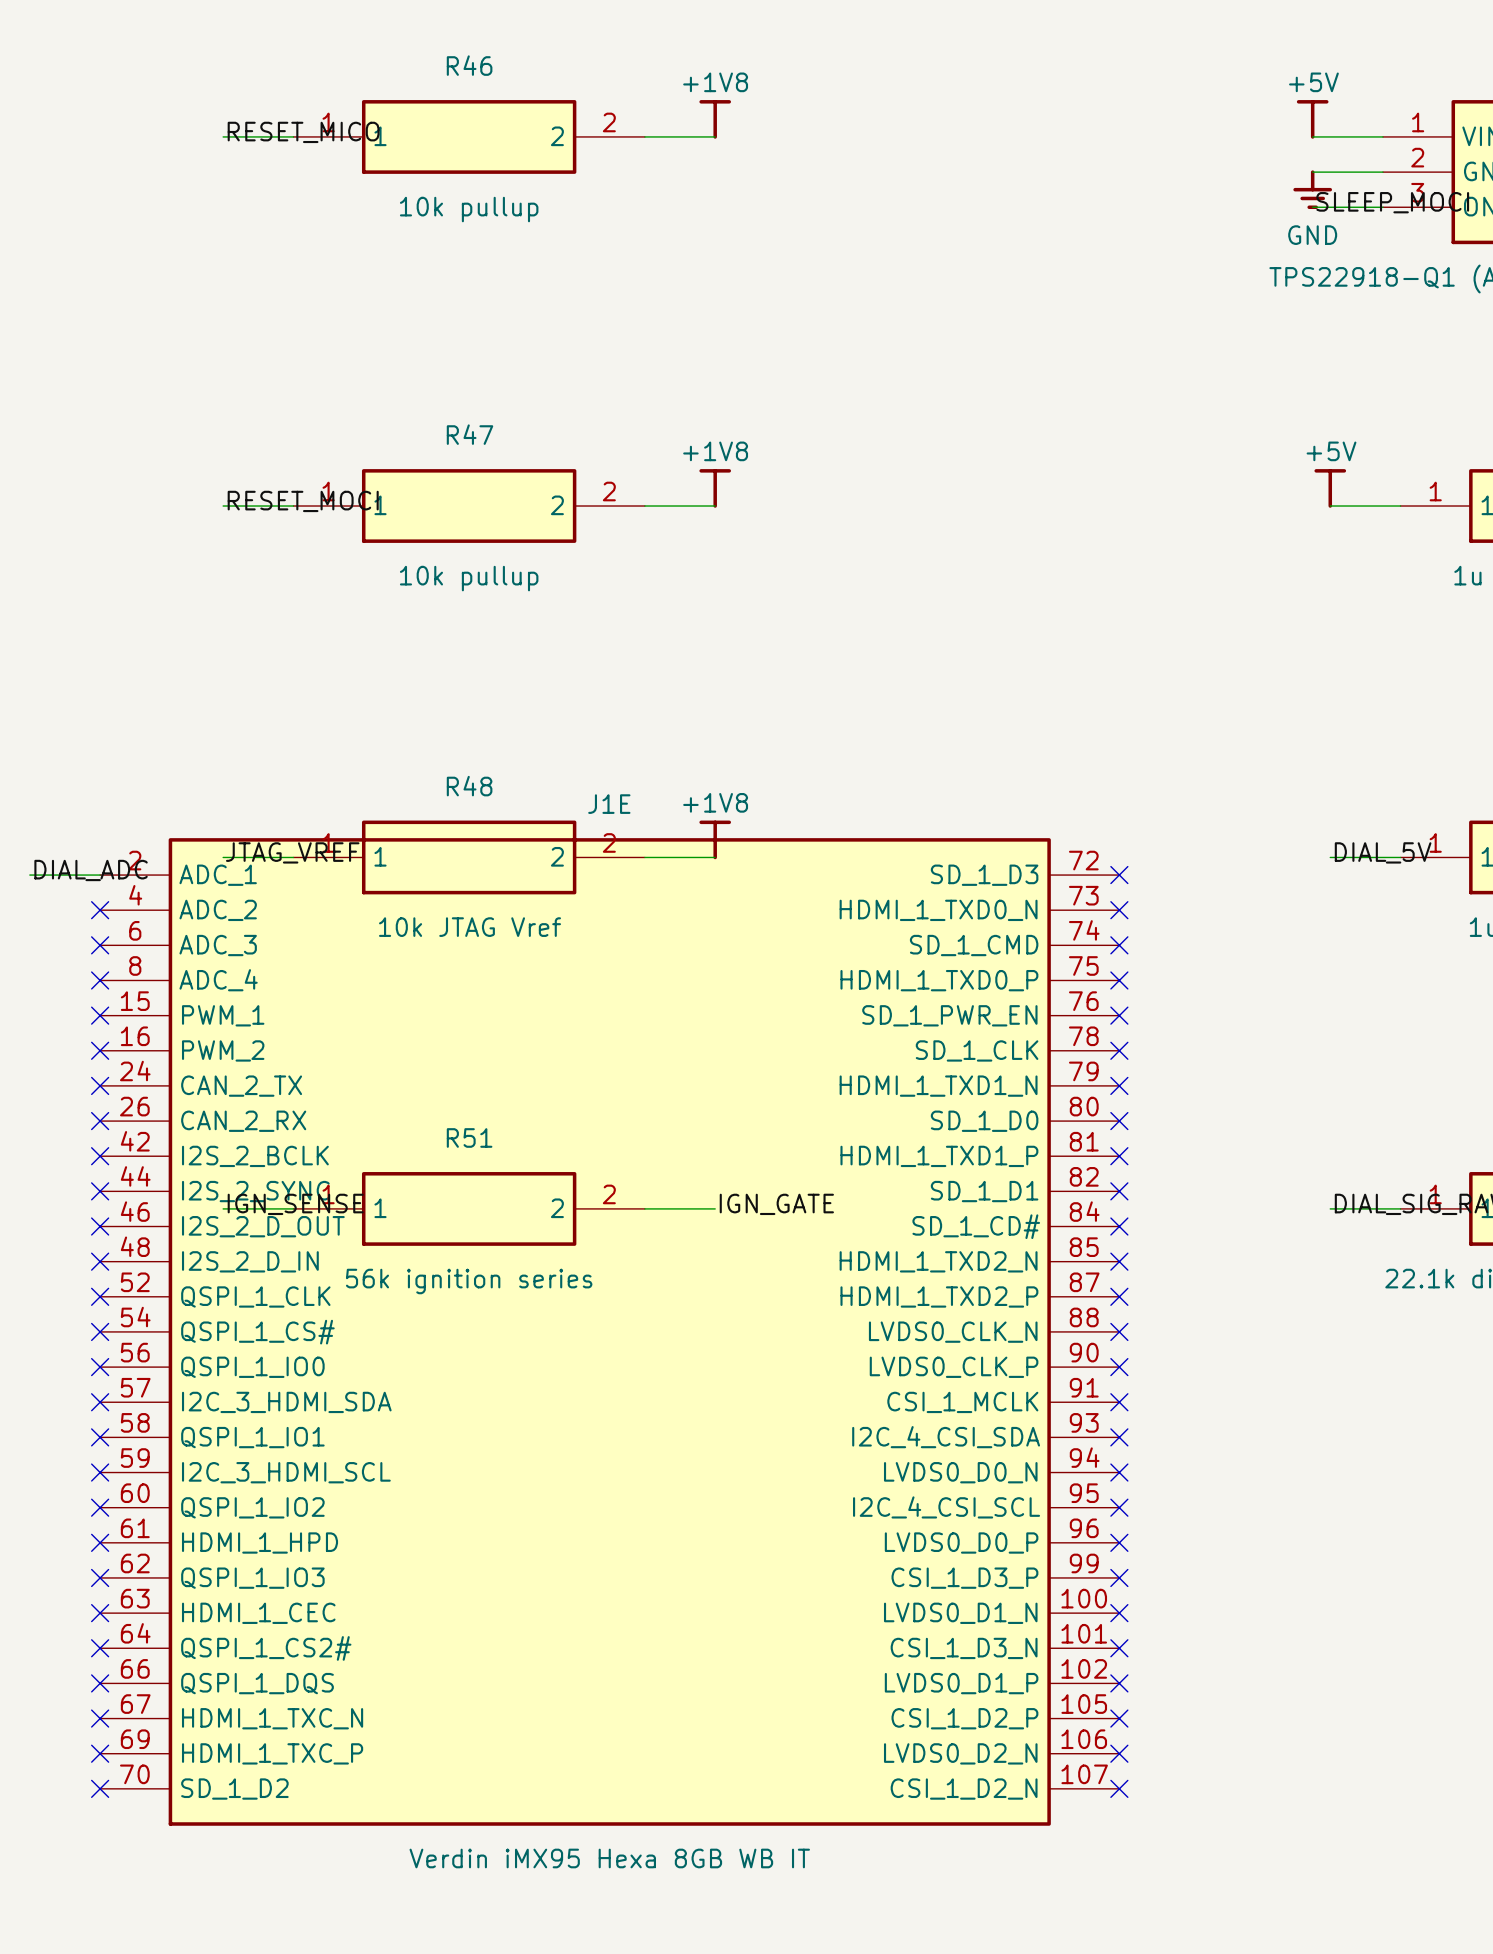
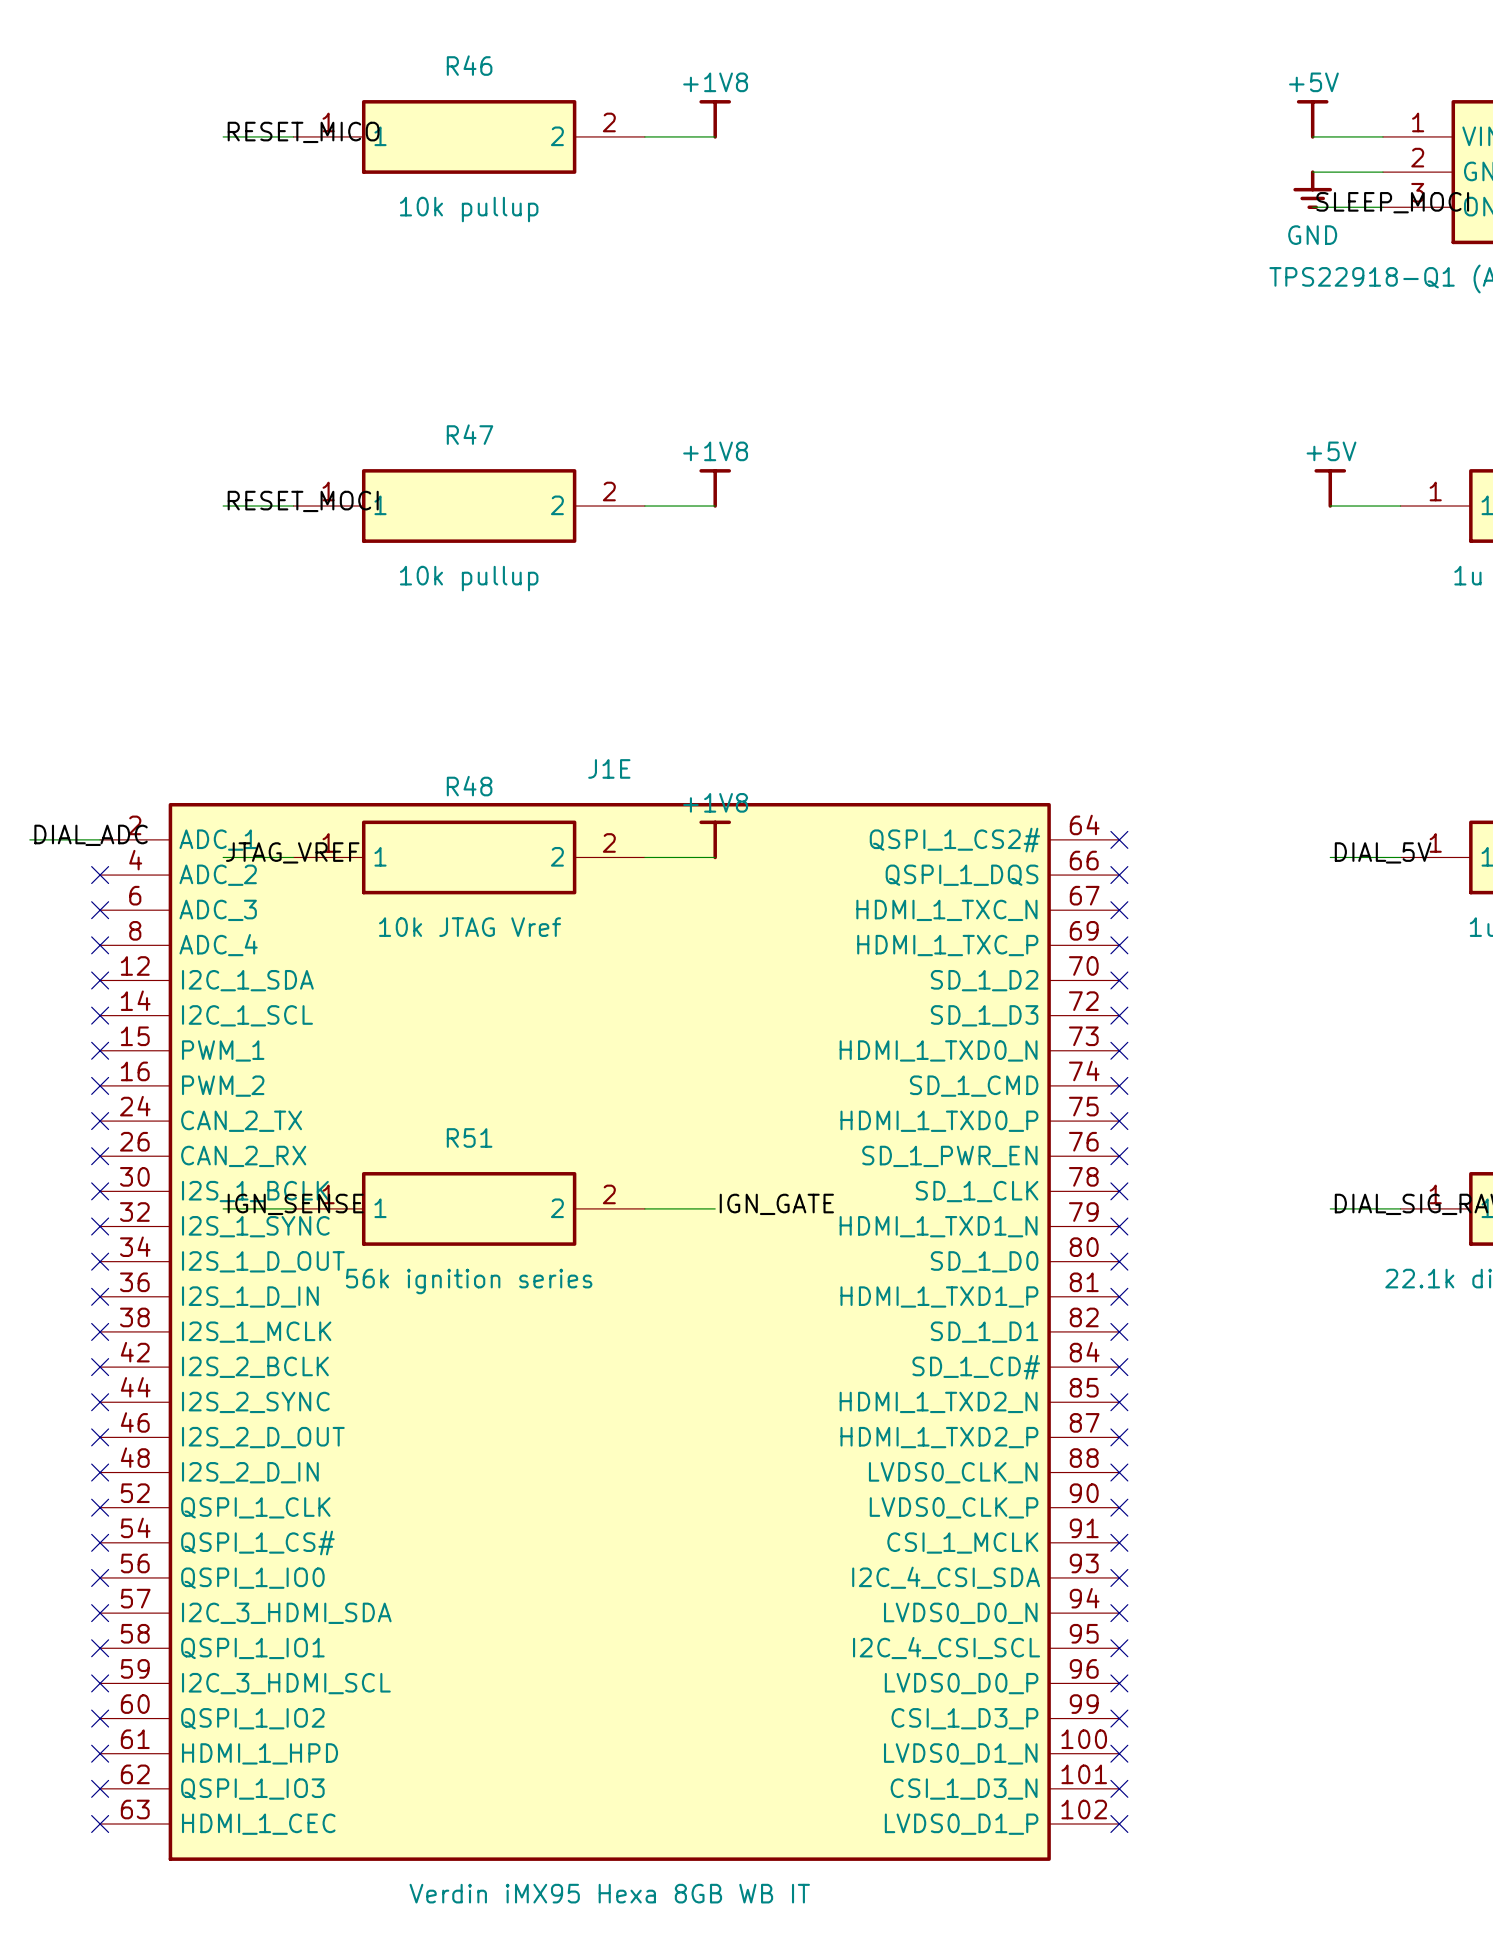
J1E name position: J1E (609, 804) -> J1E (609, 768)
J1E symbol: [100, 838, 1120, 1826] -> [100, 802, 1120, 1861]
no-connect mark: none -> (1119, 839)
label position: DIAL_ADC (91, 870) -> DIAL_ADC (91, 835)
wire: (29, 875) (100, 875) -> (29, 839) (100, 839)
no-connect mark: none -> (100, 875)
no-connect mark: none -> (100, 1824)
no-connect mark: none -> (1119, 1824)
J1E value position: Verdin iMX95 Hexa 8GB WB IT (609, 1858) -> Verdin iMX95 Hexa 8GB WB IT (609, 1893)

